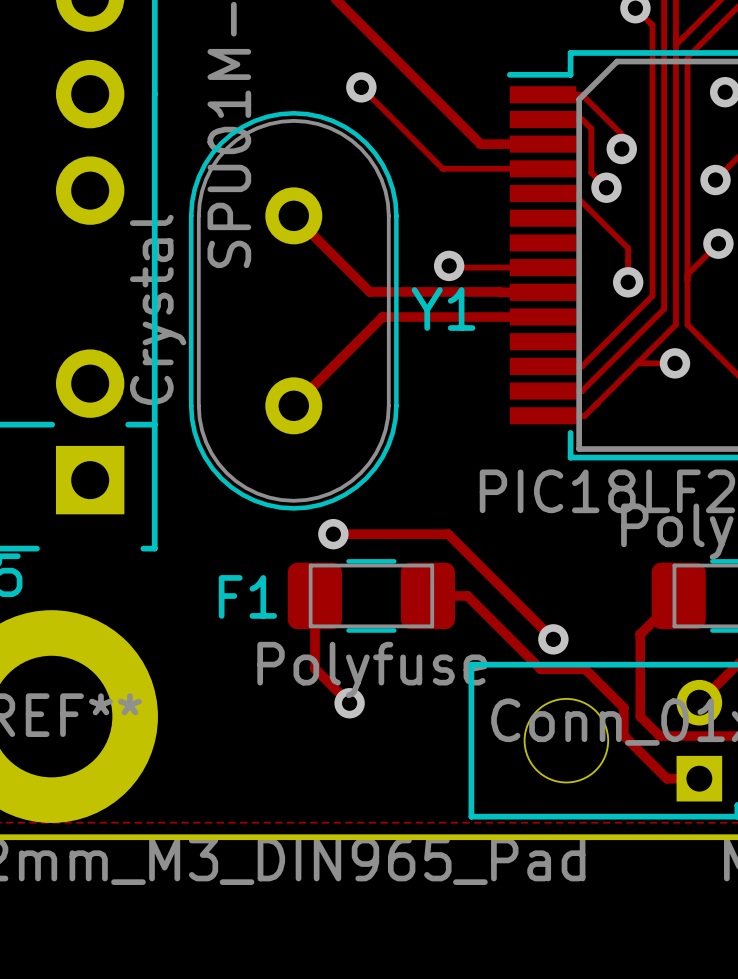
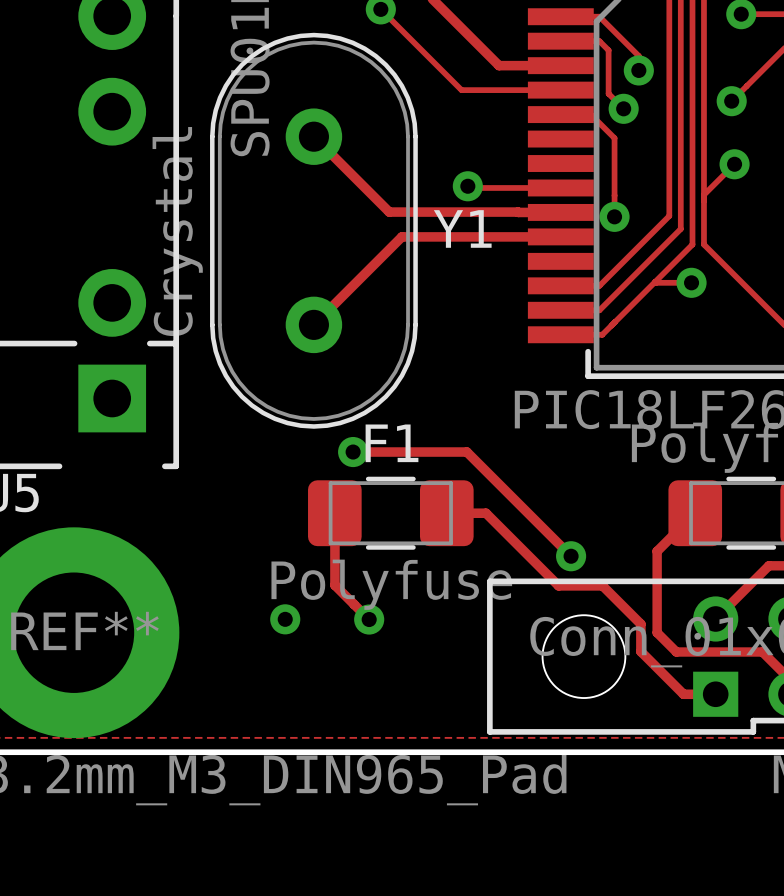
track: (597, 217) (628, 248) (628, 282) -> (614, 138) (614, 216)
via position: (628, 282) -> (614, 216)
F1 name position: F1 (247, 596) -> F1 (392, 443)
via: none -> (285, 619)

